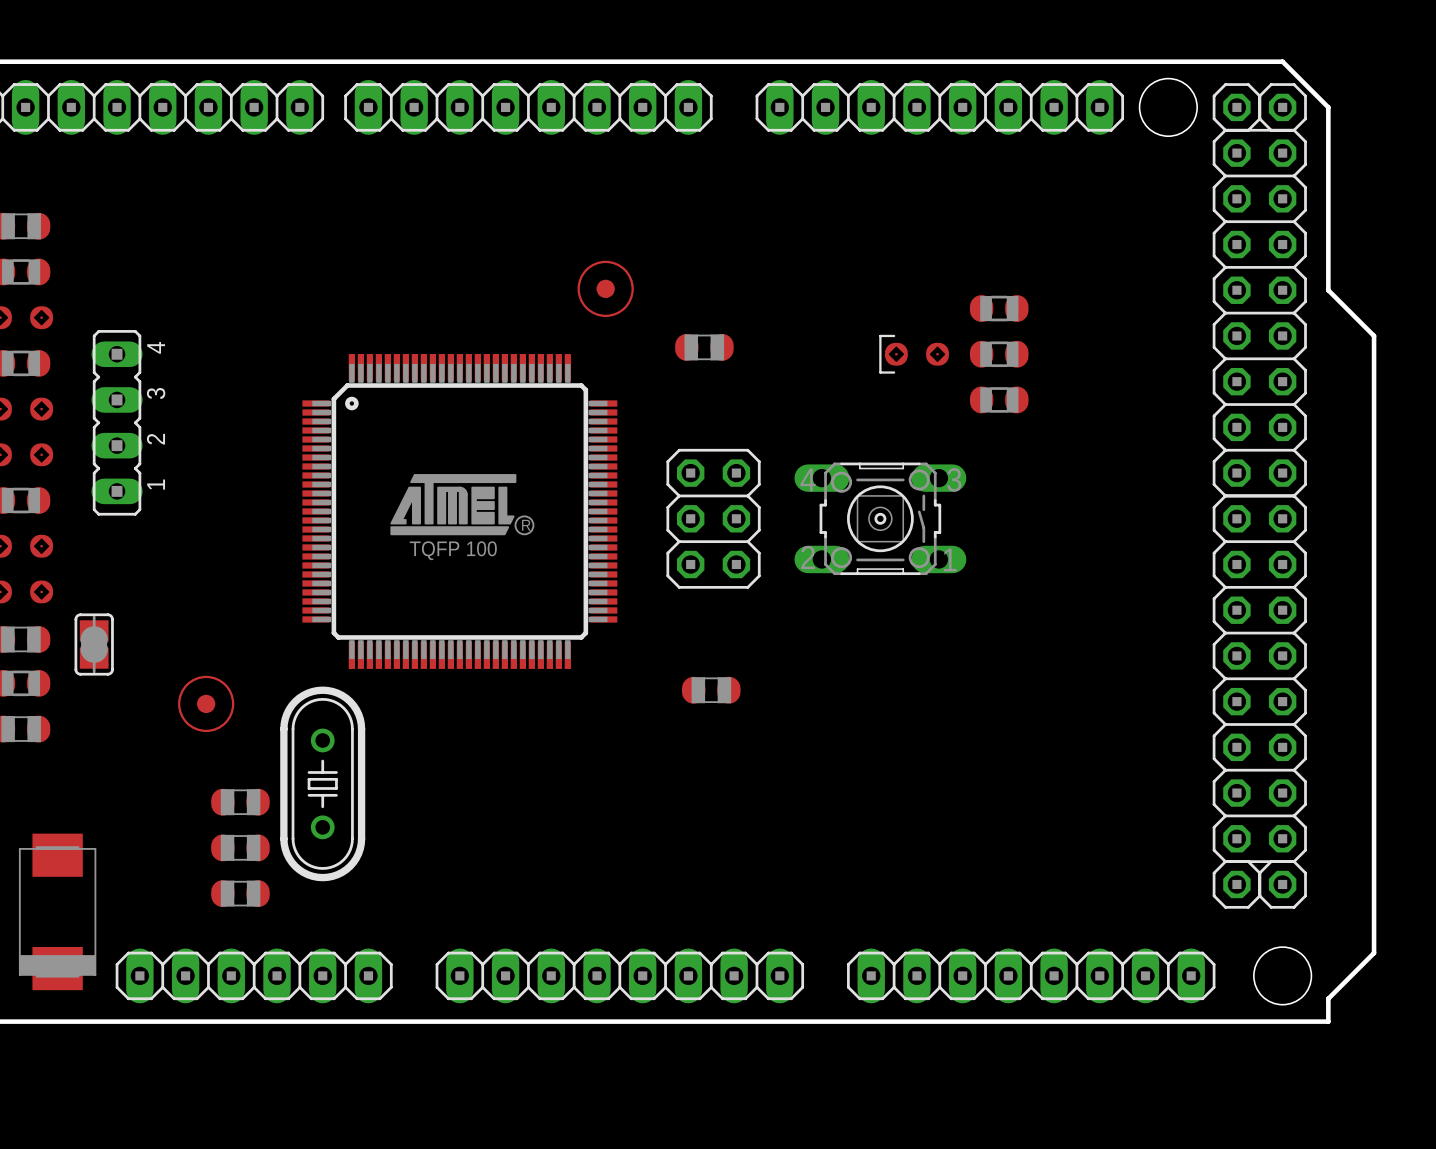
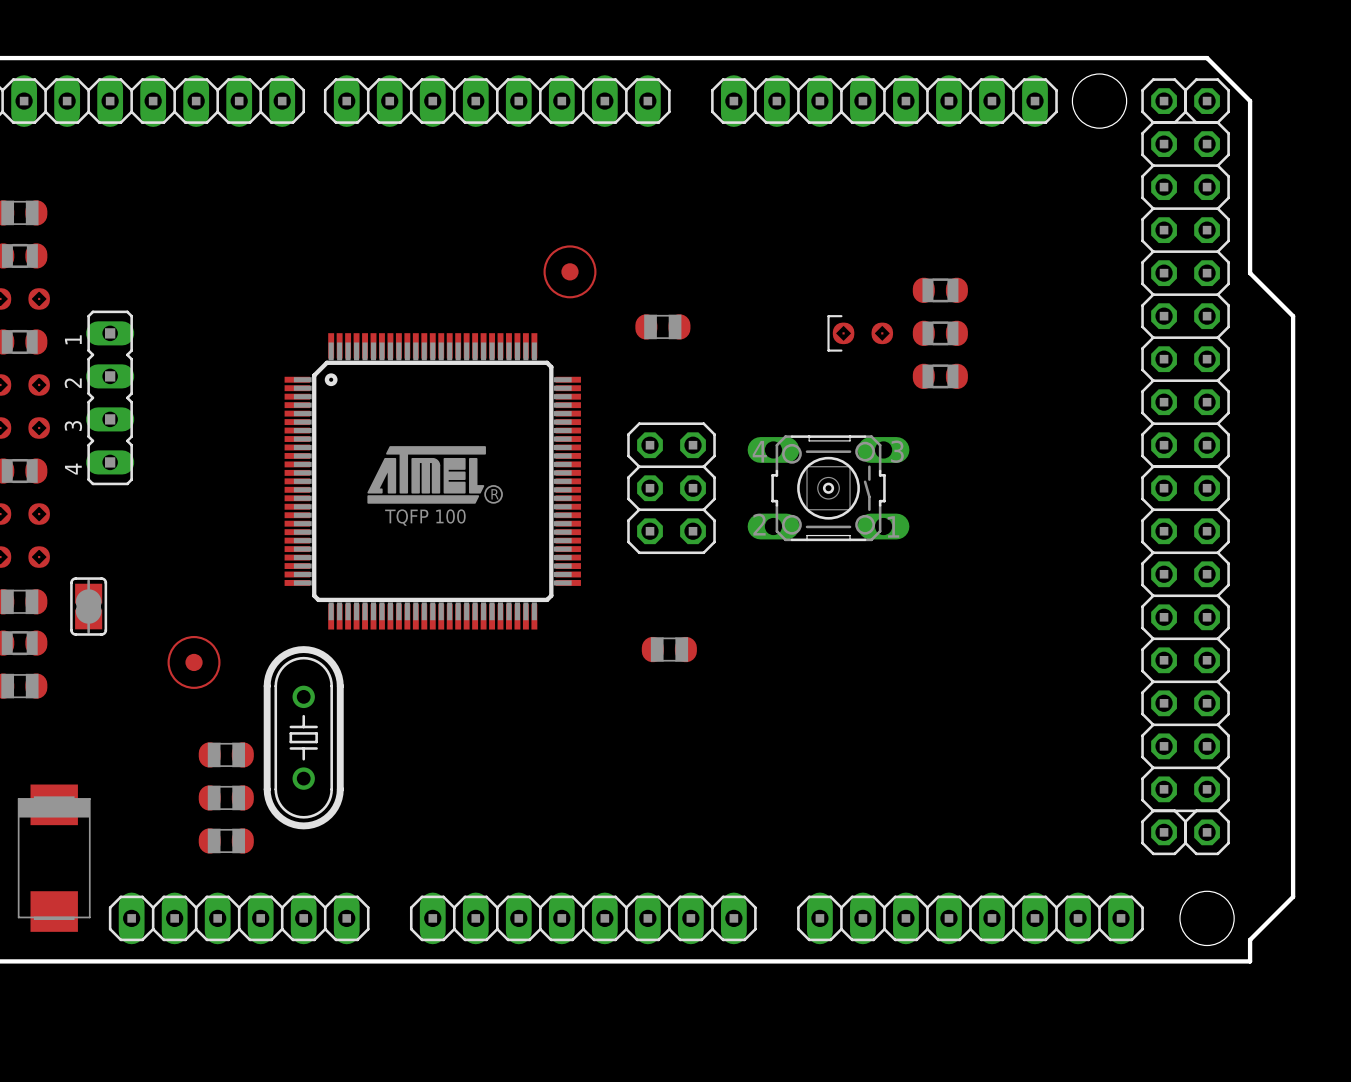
part text position: 4 (156, 347) -> 4 (73, 469)
part text position: 3 (156, 393) -> 3 (73, 426)
part text position: 2 (155, 439) -> 2 (73, 383)
part text position: 1 (156, 484) -> 1 (73, 339)
part rotation: 0° (57, 911) -> 180° (54, 858)

